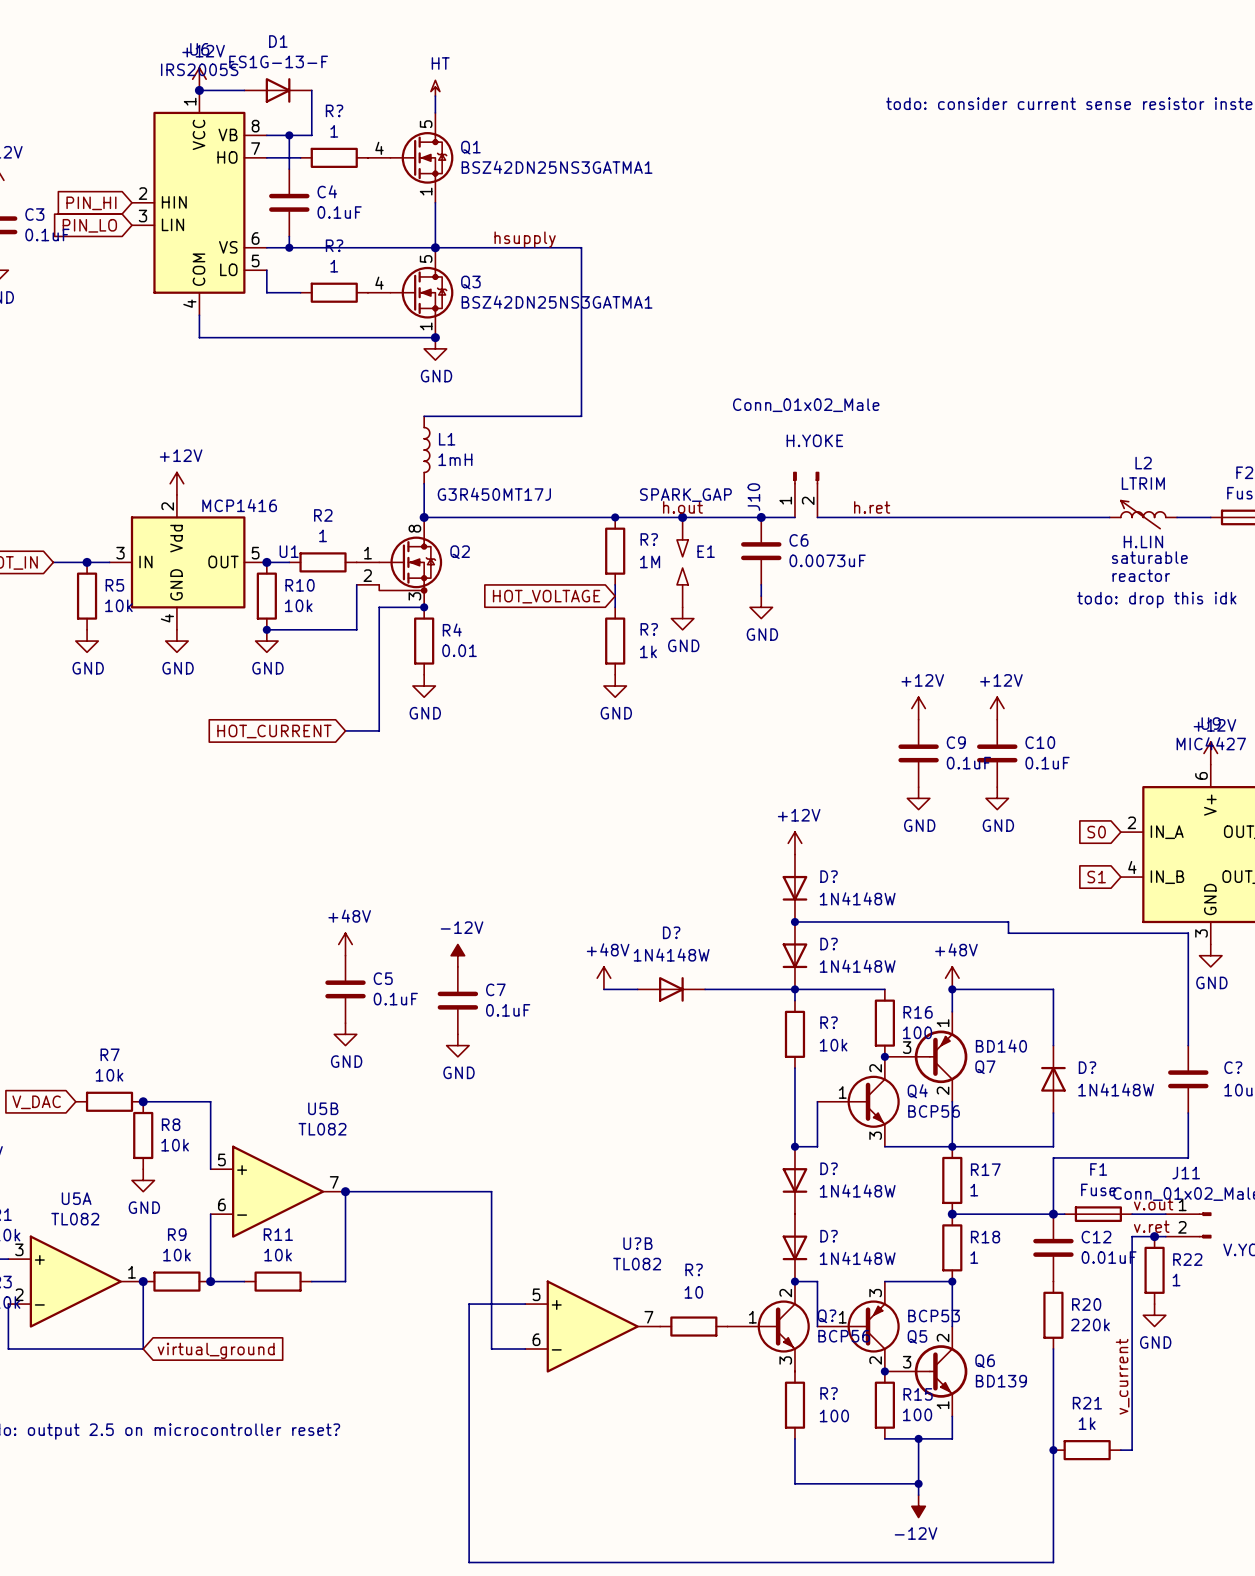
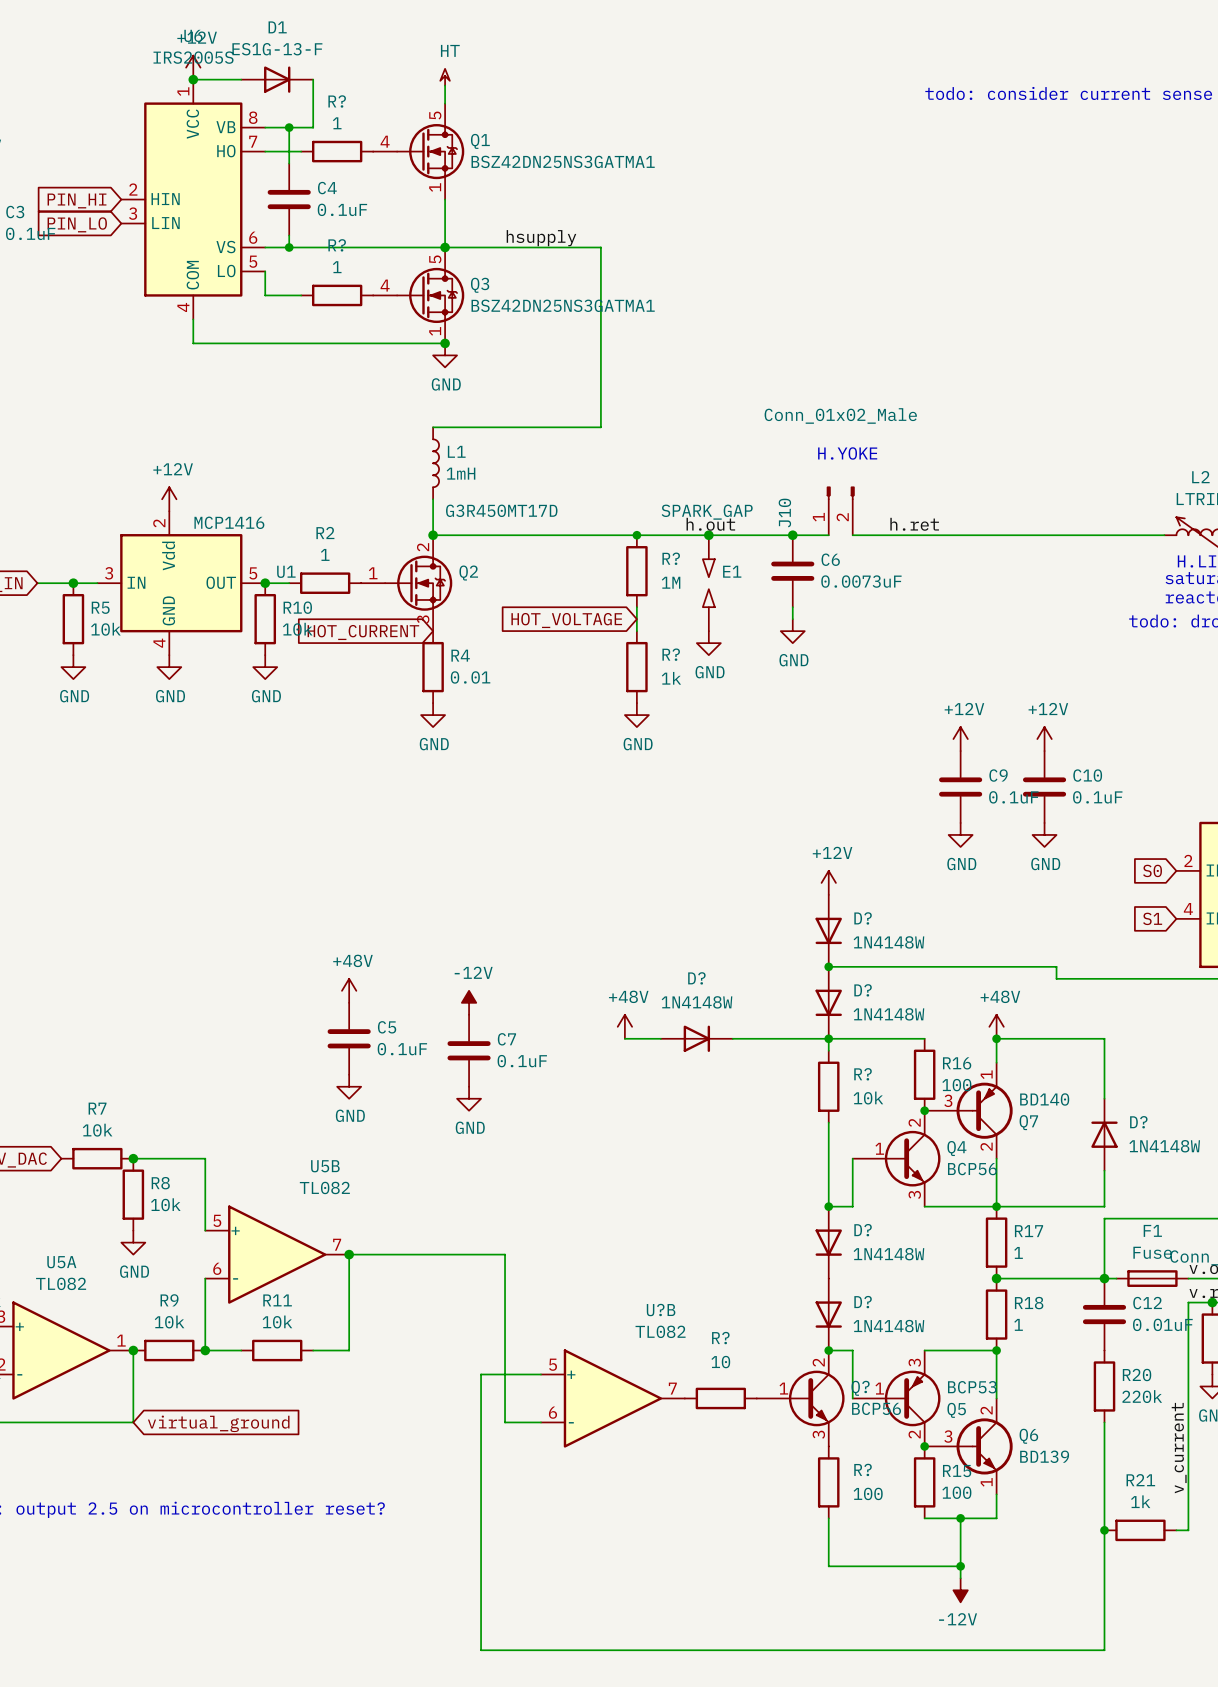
Q2 value: G3R450MT17J (494, 494) -> G3R450MT17D (501, 510)
Q2 symbol: [356, 517, 443, 608] -> [361, 535, 453, 632]
wire: (356, 584) (356, 629) (266, 629) -> none
wire: (424, 607) (379, 607) (379, 730) (345, 730) -> none
junction: (424, 607) -> none
junction: (266, 629) -> none
global label position: HOT_CURRENT (274, 731) -> HOT_CURRENT (363, 632)

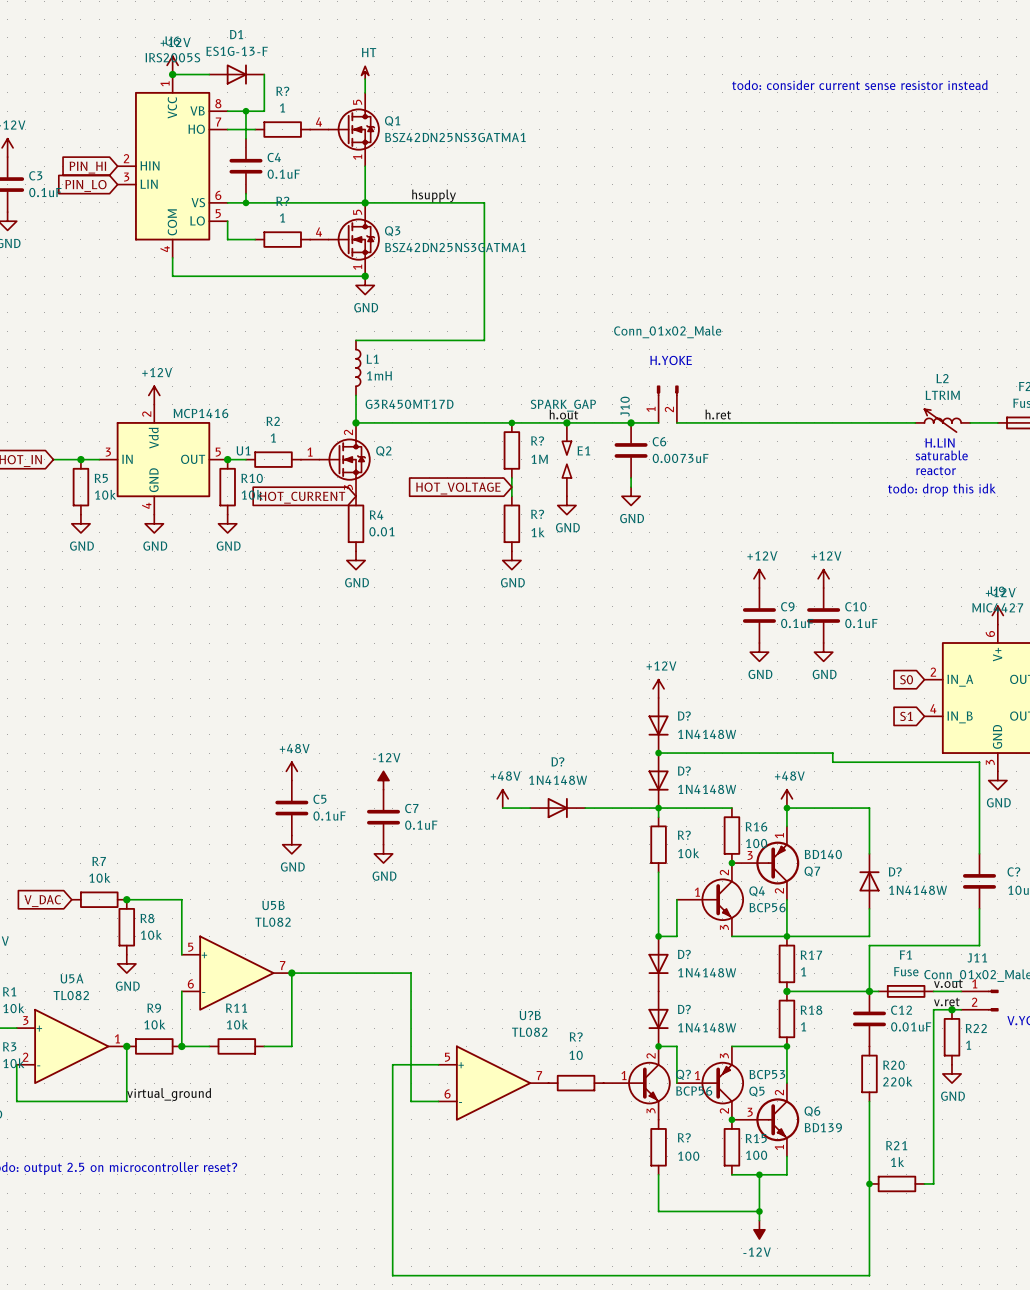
label: none -> virtual_ground (169, 1094)
global label: virtual_ground (218, 1423) -> none
label: v_current (1179, 1448) -> none

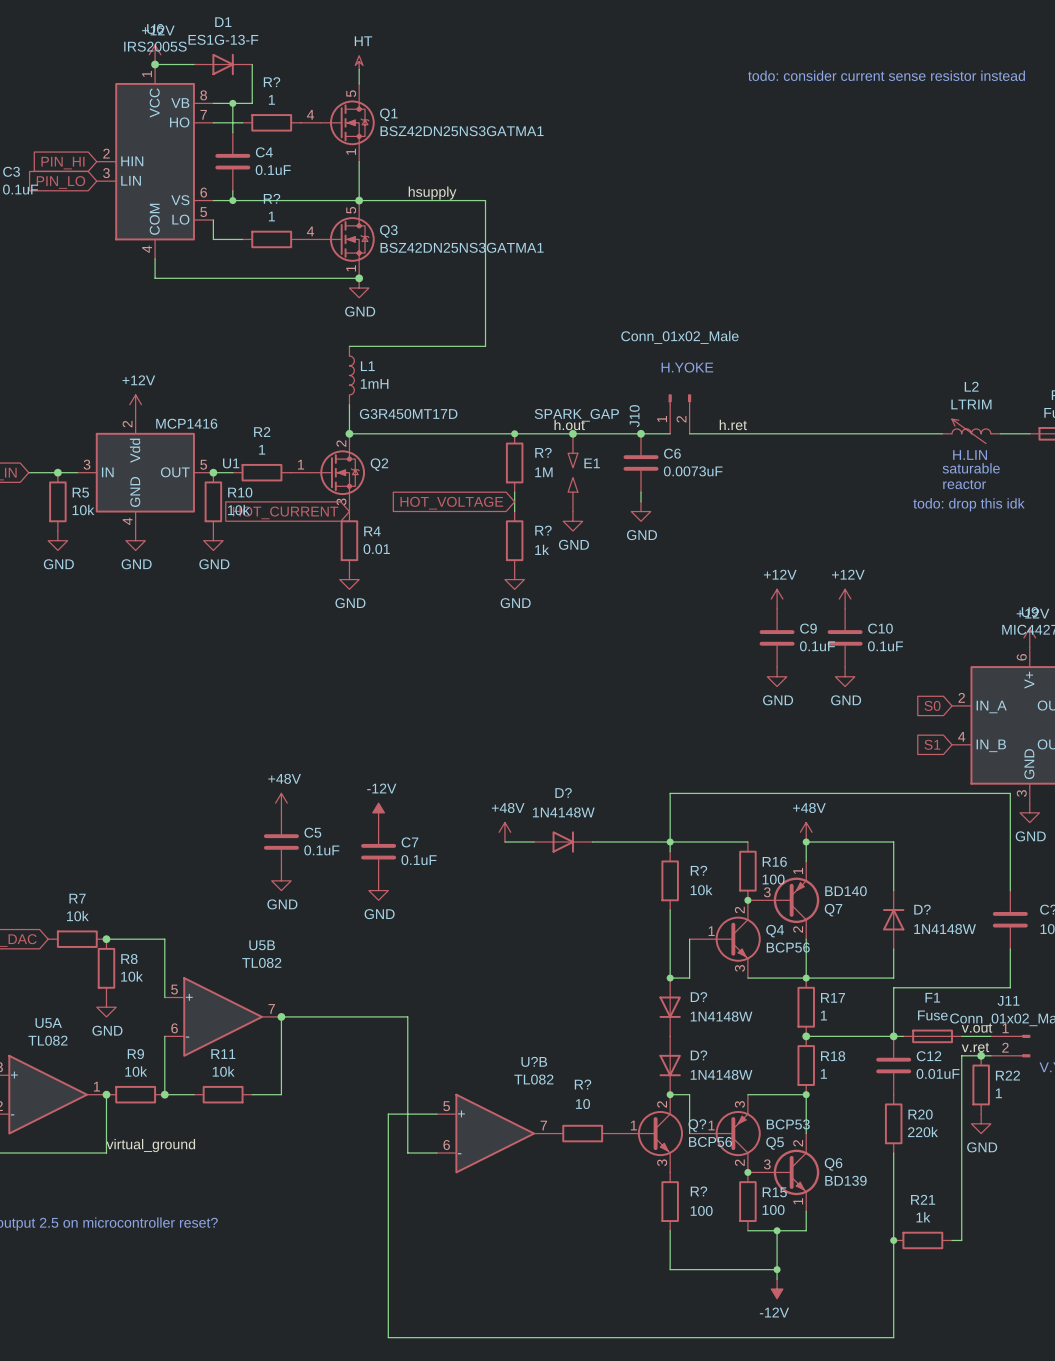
power symbol: +12V (658, 688) -> none
D?: 1N4148W (658, 725) -> none
wire: (658, 753) (832, 753) (832, 762) -> (670, 842) (670, 793) (854, 793)
junction: (658, 753) -> none
D?: 1N4148W (658, 780) -> none

